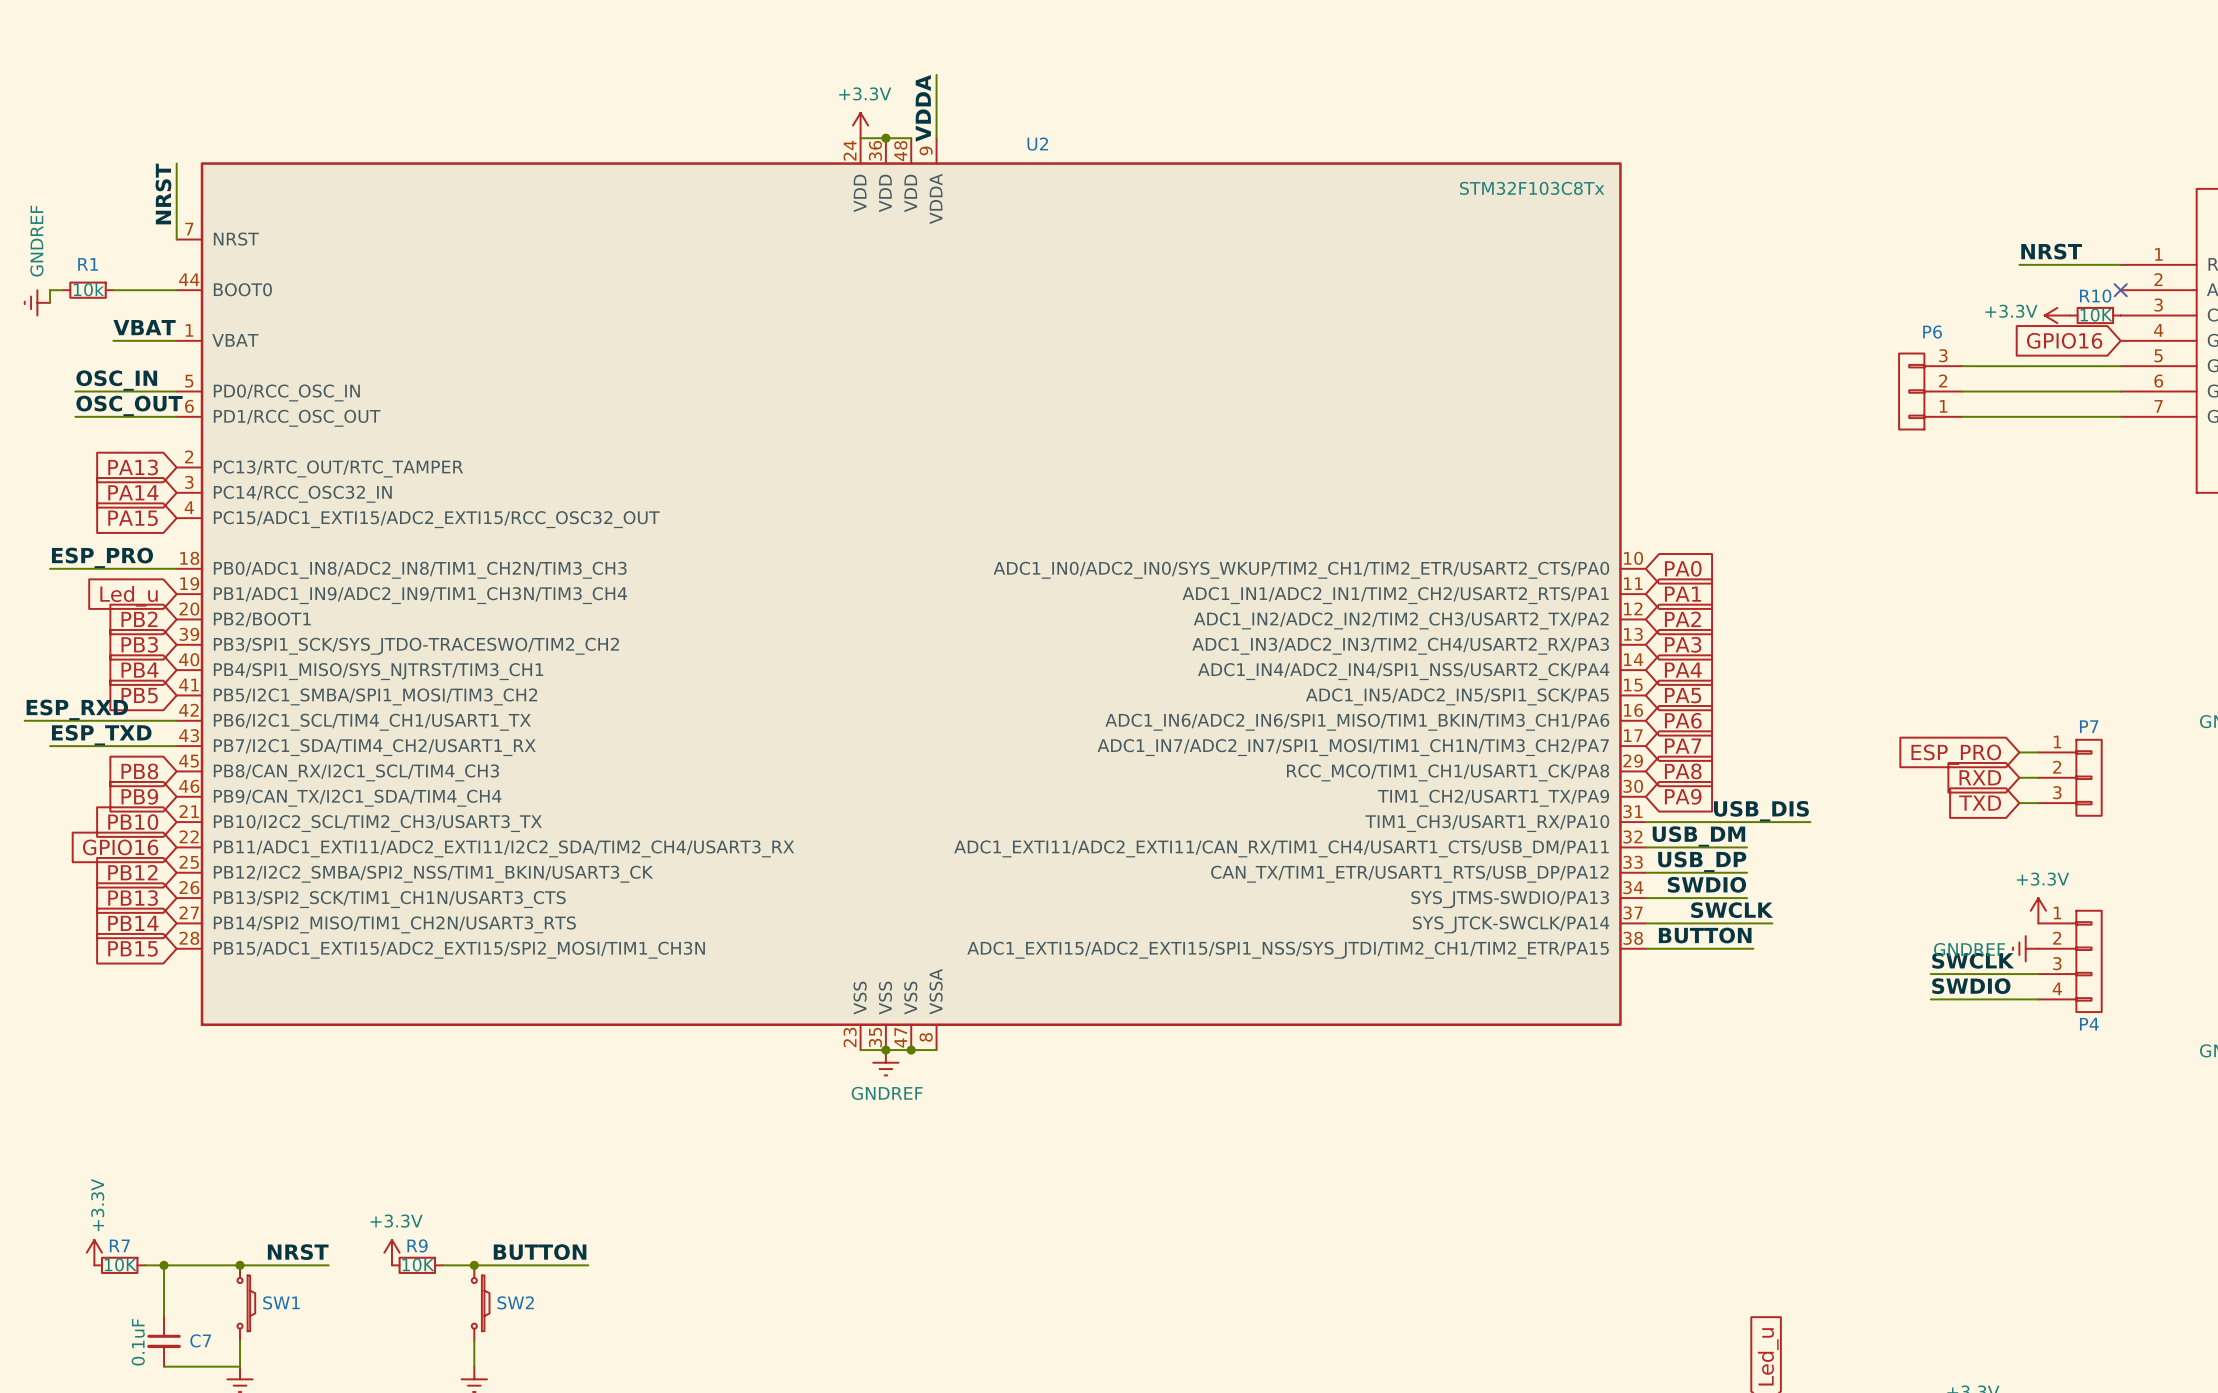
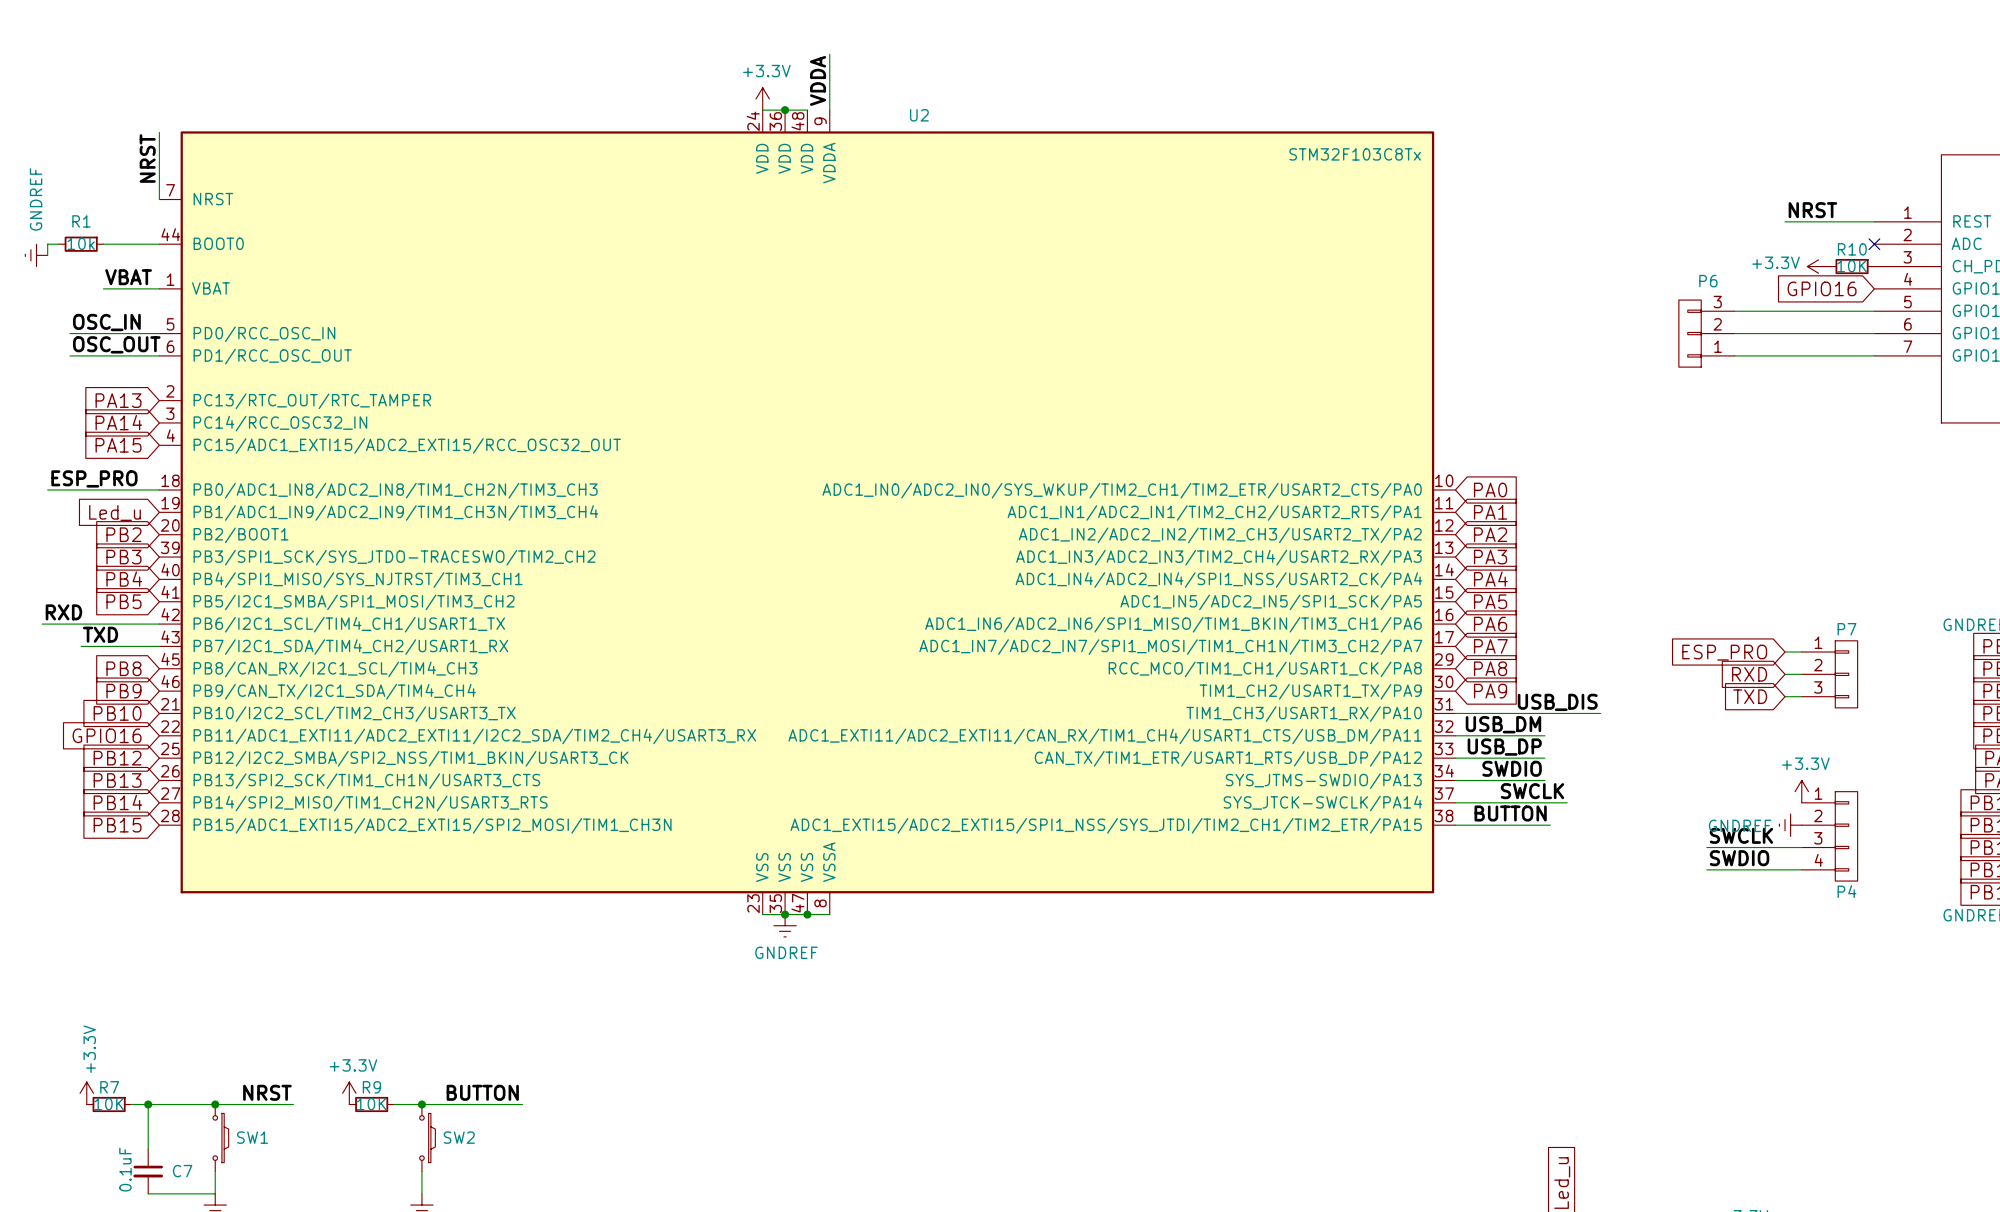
label: none -> RXD (63, 612)
label: ESP_RXD (77, 709) -> none
wire: (24, 720) (43, 720) -> none
label: none -> TXD (100, 634)
label: ESP_TXD (101, 735) -> none
wire: (50, 746) (88, 746) -> none

